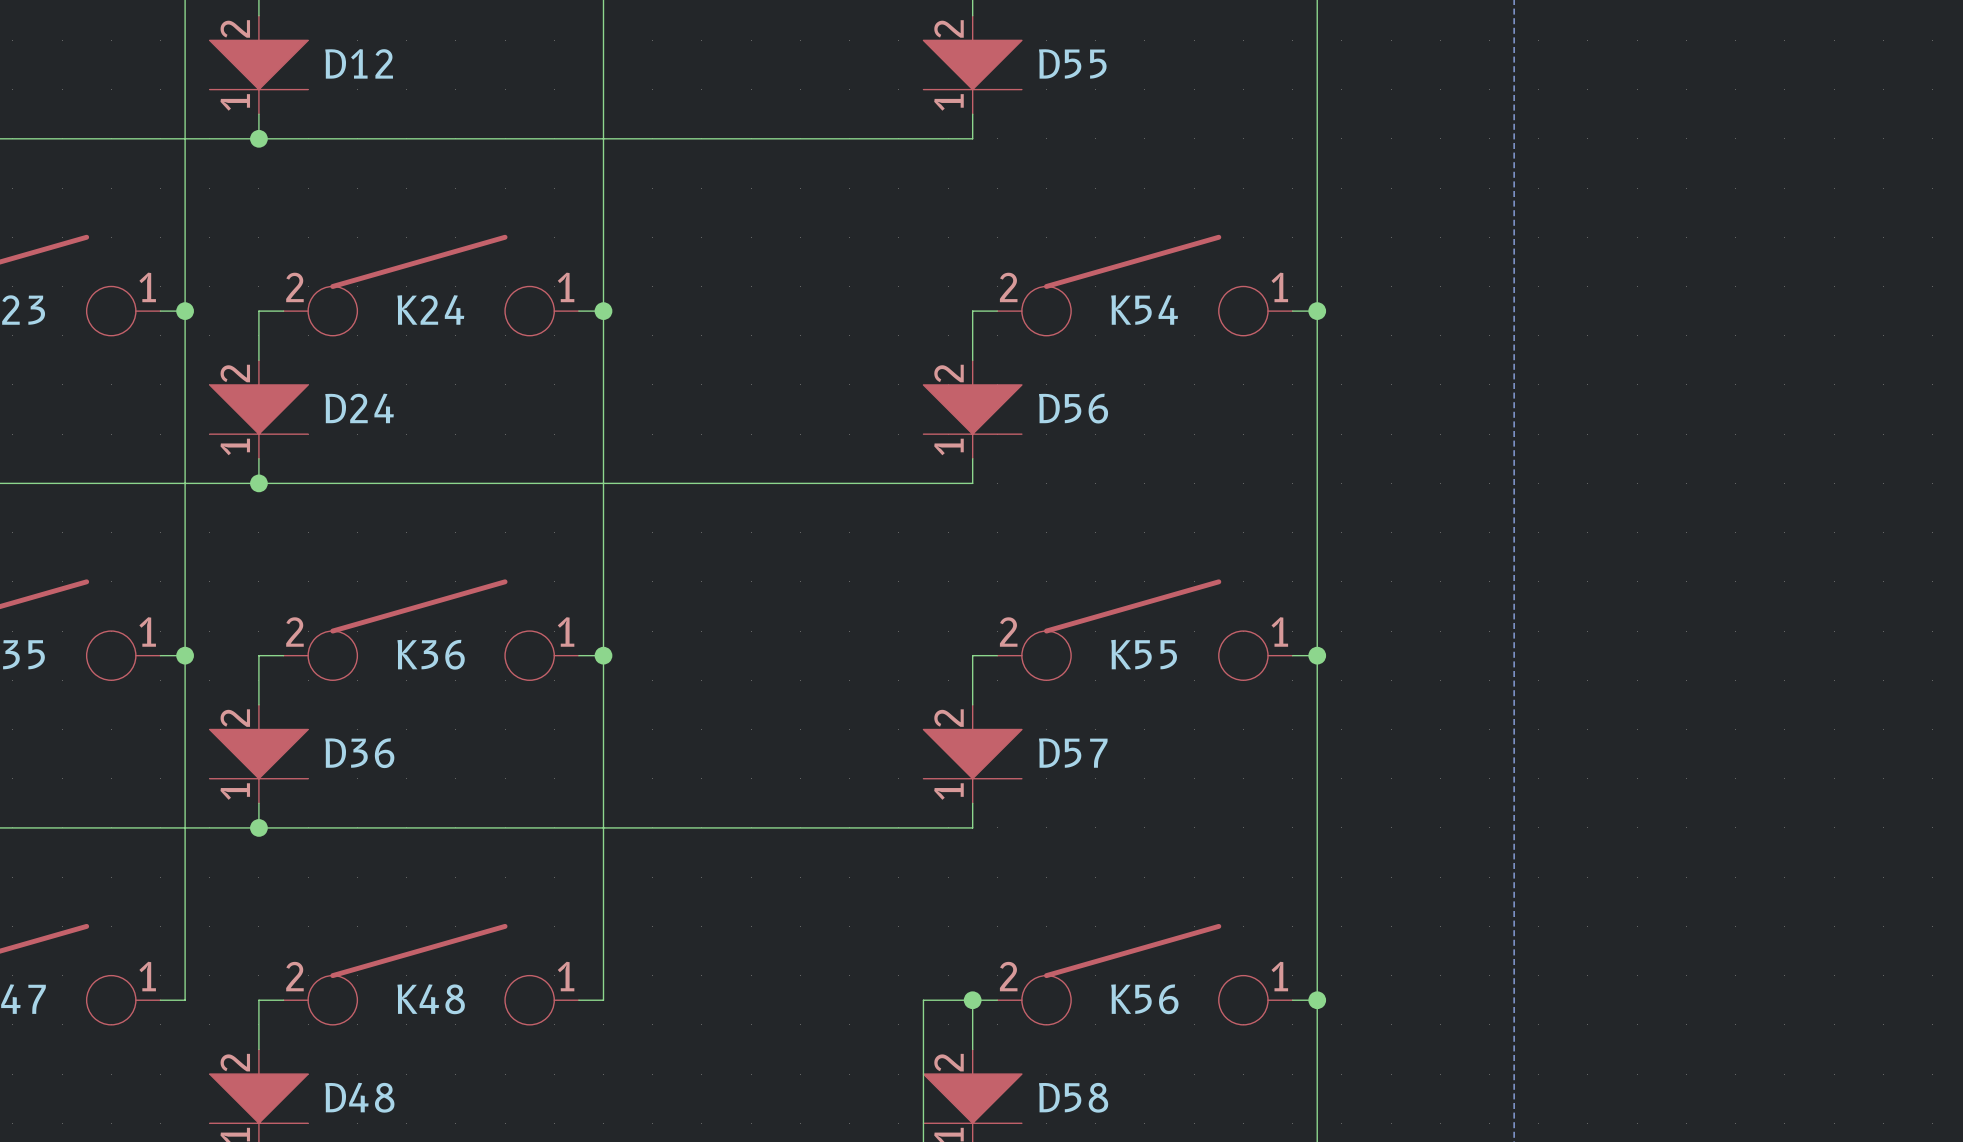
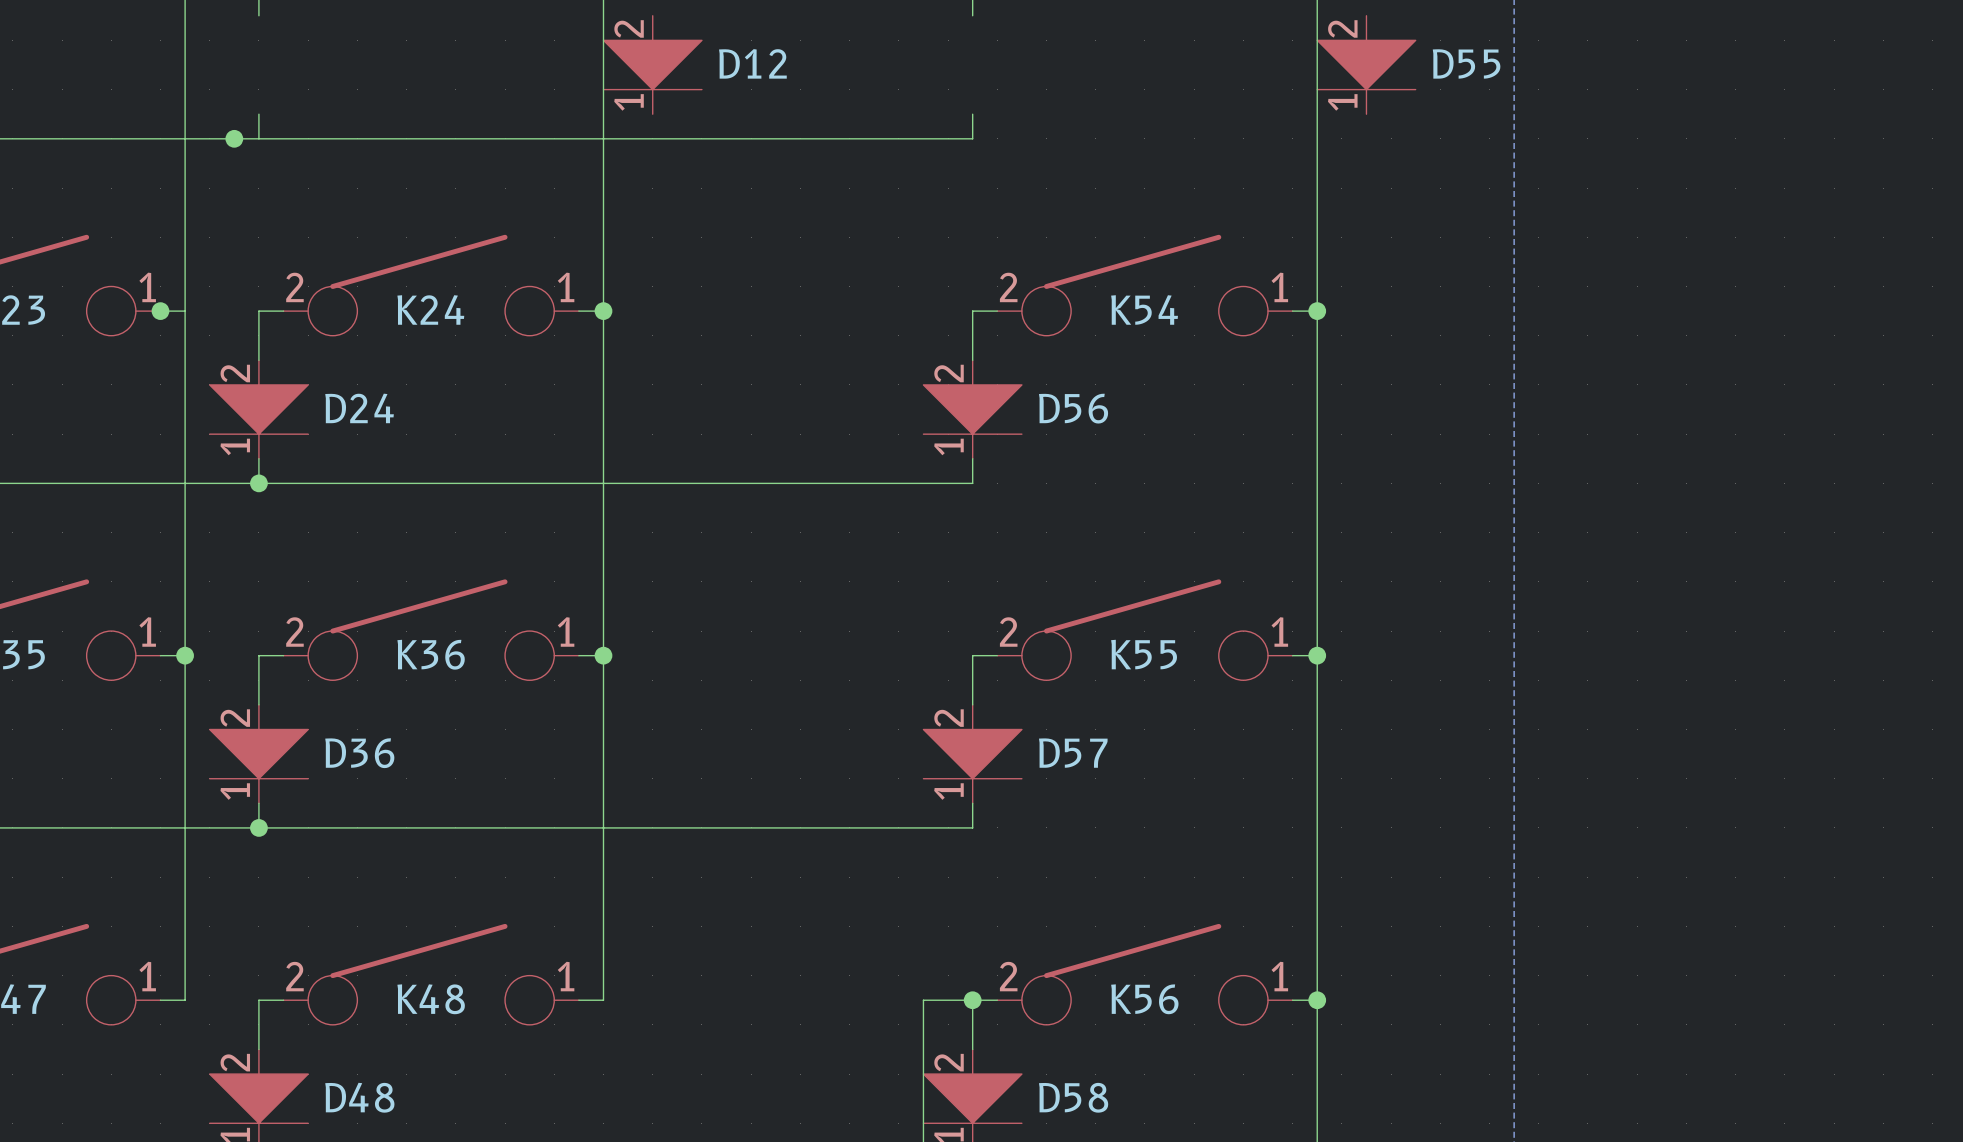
D12 position: (258, 64) -> (652, 64)
D55 position: (972, 64) -> (1366, 64)
junction position: (258, 138) -> (234, 138)
junction position: (185, 311) -> (160, 311)

